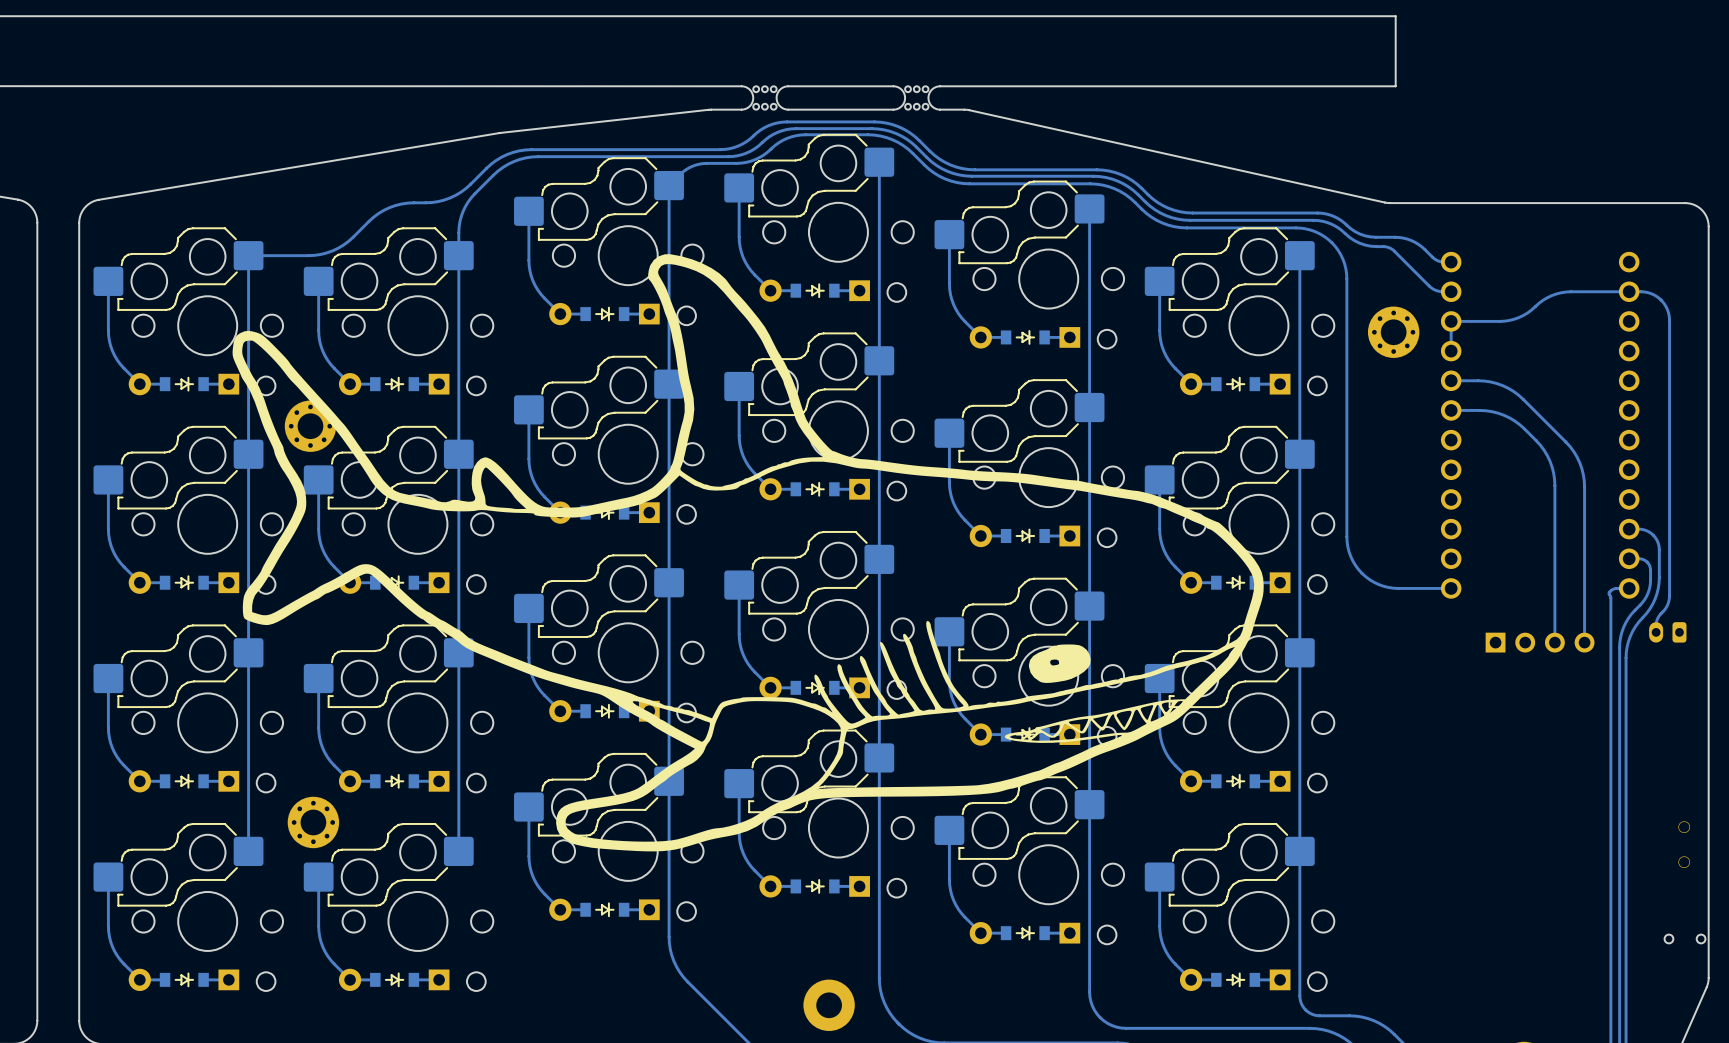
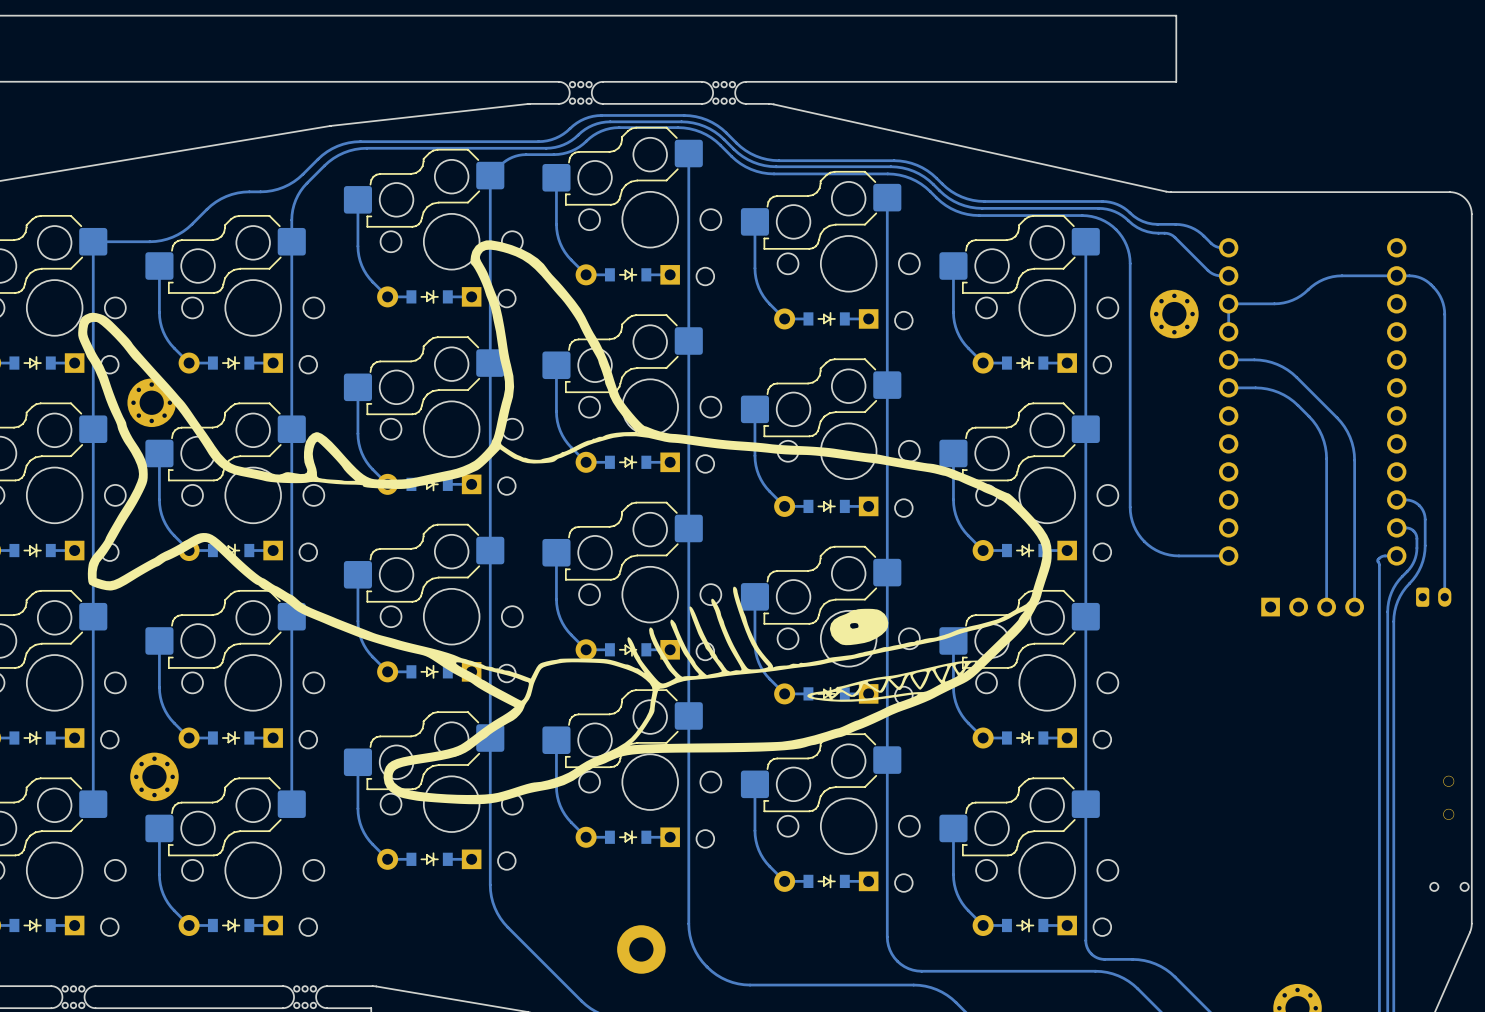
track: (1640, 291) (1651, 293) (1661, 300) -> (1407, 275) (1421, 278) (1431, 284) (1440, 296) (1444, 310) (1444, 597)
track: (1661, 300) (1667, 309) (1669, 320) (1669, 595) (1666, 606) (1657, 619) (1656, 632) -> none
part side: top (1667, 632) -> bottom (1433, 597)

